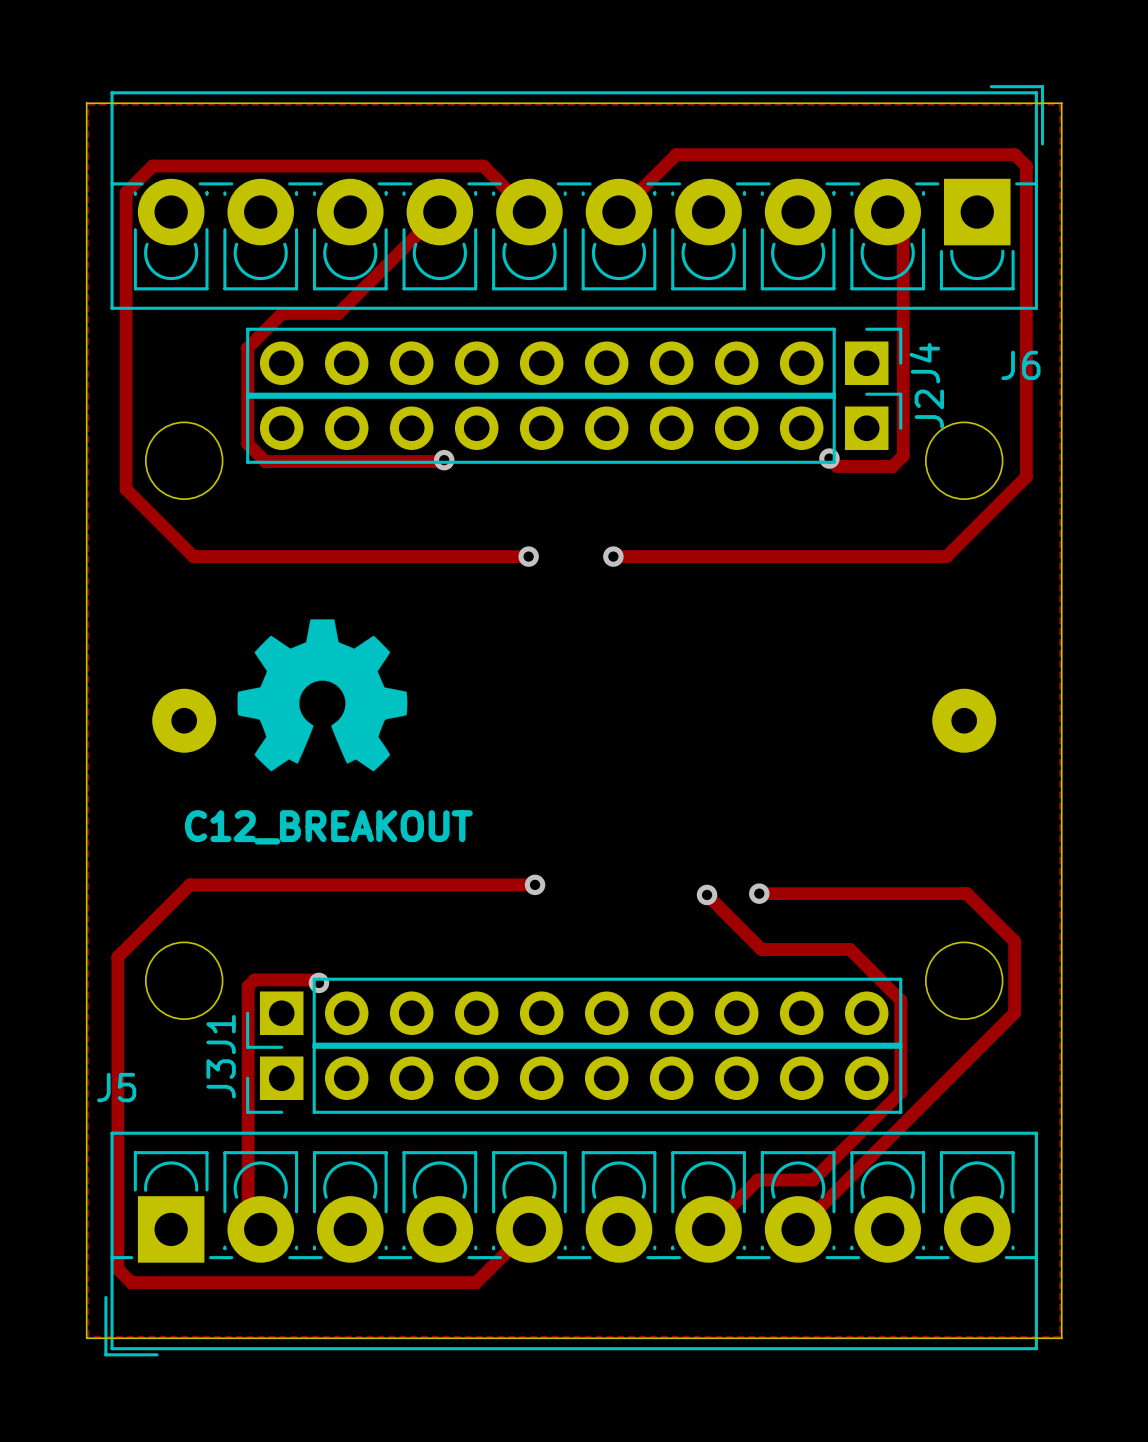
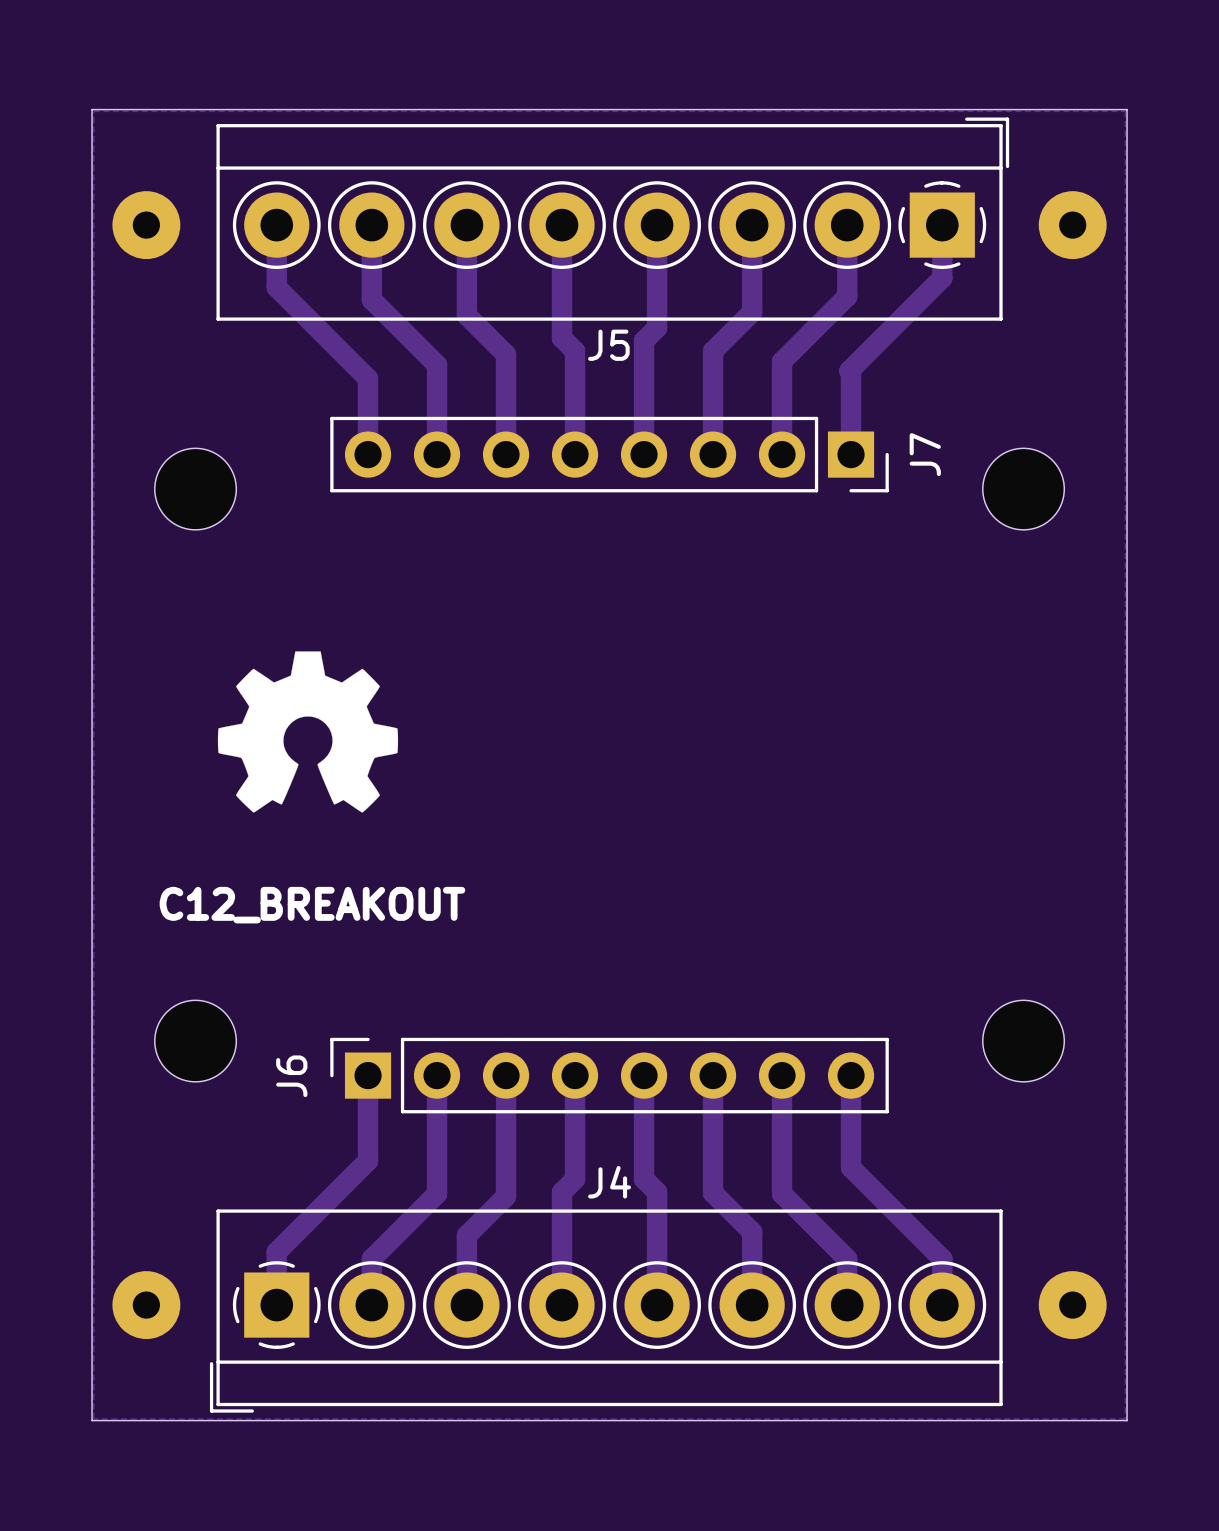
J6 footprint: [110, 85, 1045, 310] -> [330, 1037, 889, 1114]
part: none -> (146, 225)
track: none -> (276, 225) (276, 287) (368, 378) (368, 454)
track: none -> (371, 225) (371, 299) (437, 364) (437, 454)
track: (439, 212) (338, 313) (282, 313) (247, 347) (247, 443) (265, 461) (444, 460) -> (466, 225) (466, 315) (506, 354) (506, 454)
track: (529, 212) (483, 166) (152, 166) (126, 192) (126, 489) (193, 556) (528, 556) -> (562, 225) (562, 338) (575, 351) (575, 454)
track: (618, 212) (676, 154) (1014, 154) (1026, 166) (1026, 476) (946, 556) (613, 556) -> (657, 225) (657, 327) (644, 340) (644, 454)
track: none -> (752, 225) (752, 312) (713, 351) (713, 454)
track: none -> (847, 225) (847, 296) (782, 361) (782, 454)
track: (887, 212) (903, 227) (903, 455) (892, 466) (837, 466) (829, 458) -> (942, 225) (942, 278) (849, 371) (851, 372) (851, 454)
part: none -> (1072, 225)
J4 footprint: [246, 327, 903, 399] -> [209, 1209, 1003, 1413]
J4 name position: J4 (924, 363) -> J4 (609, 1182)
J6 name position: J6 (1020, 365) -> J6 (291, 1076)
J2: (574, 428) -> none
J7: none -> (609, 454)
via: (829, 458) -> none
via: (444, 460) -> none
via: (528, 556) -> none
via: (613, 556) -> none
drawing position: (322, 695) -> (307, 732)
part: (184, 720) -> none
part: (964, 720) -> none
text position: C12_BREAKOUT (328, 827) -> C12_BREAKOUT (312, 905)
track: (535, 884) (189, 884) (117, 956) (117, 1269) (131, 1282) -> none
via: (535, 884) -> none
track: (759, 893) (966, 893) (1014, 941) (1014, 1012) (798, 1229) -> (782, 1075) (782, 1193) (847, 1258) (847, 1305)
via: (759, 893) -> none
track: (707, 894) (761, 949) (850, 949) (900, 1000) (900, 1092) (813, 1179) (758, 1179) (708, 1229) -> (713, 1075) (713, 1192) (752, 1232) (752, 1305)
via: (707, 894) -> none
track: (318, 982) (316, 979) (254, 979) (248, 986) (248, 1216) (260, 1229) -> (368, 1075) (368, 1160) (276, 1252) (276, 1305)
via: (318, 982) -> none
track: none -> (437, 1075) (437, 1193) (371, 1258) (371, 1305)
track: none -> (506, 1075) (506, 1196) (466, 1235) (466, 1305)
J1: (574, 1013) -> none
track: none -> (644, 1075) (644, 1179) (657, 1192) (657, 1305)
track: none -> (851, 1075) (851, 1167) (942, 1258) (942, 1305)
J3: (574, 1078) -> none
J5 name position: J5 (116, 1087) -> J5 (608, 345)
J5 footprint: [104, 1131, 1038, 1357] -> [216, 117, 1010, 321]
part: none -> (146, 1305)
track: (529, 1229) (476, 1282) (131, 1282) -> (562, 1305) (562, 1192) (575, 1179) (575, 1075)
part: none -> (1072, 1305)

